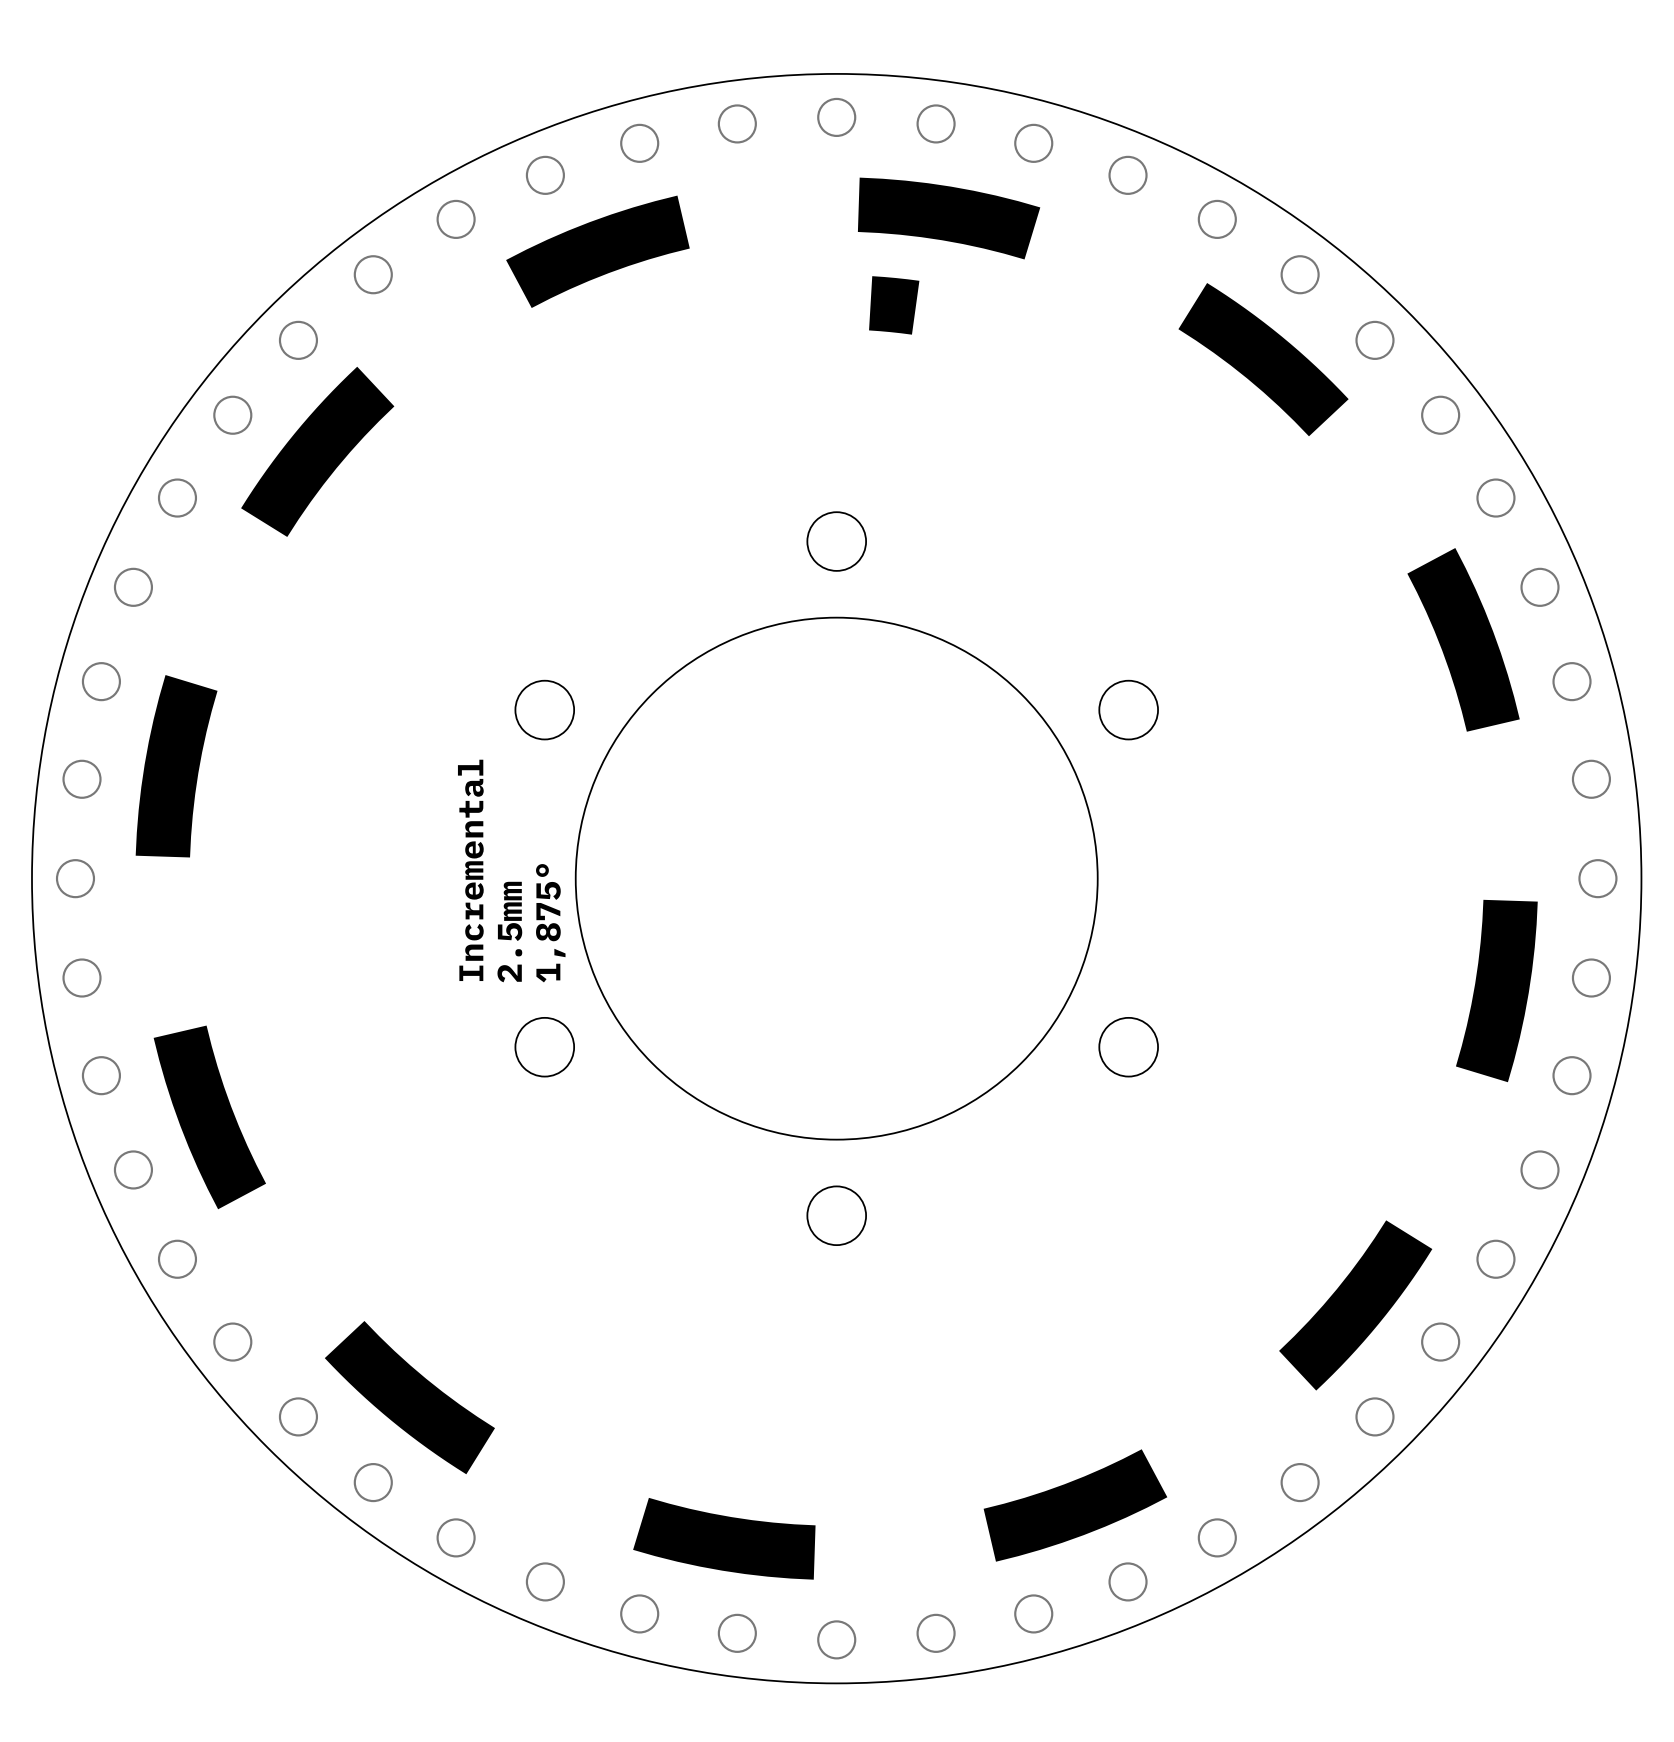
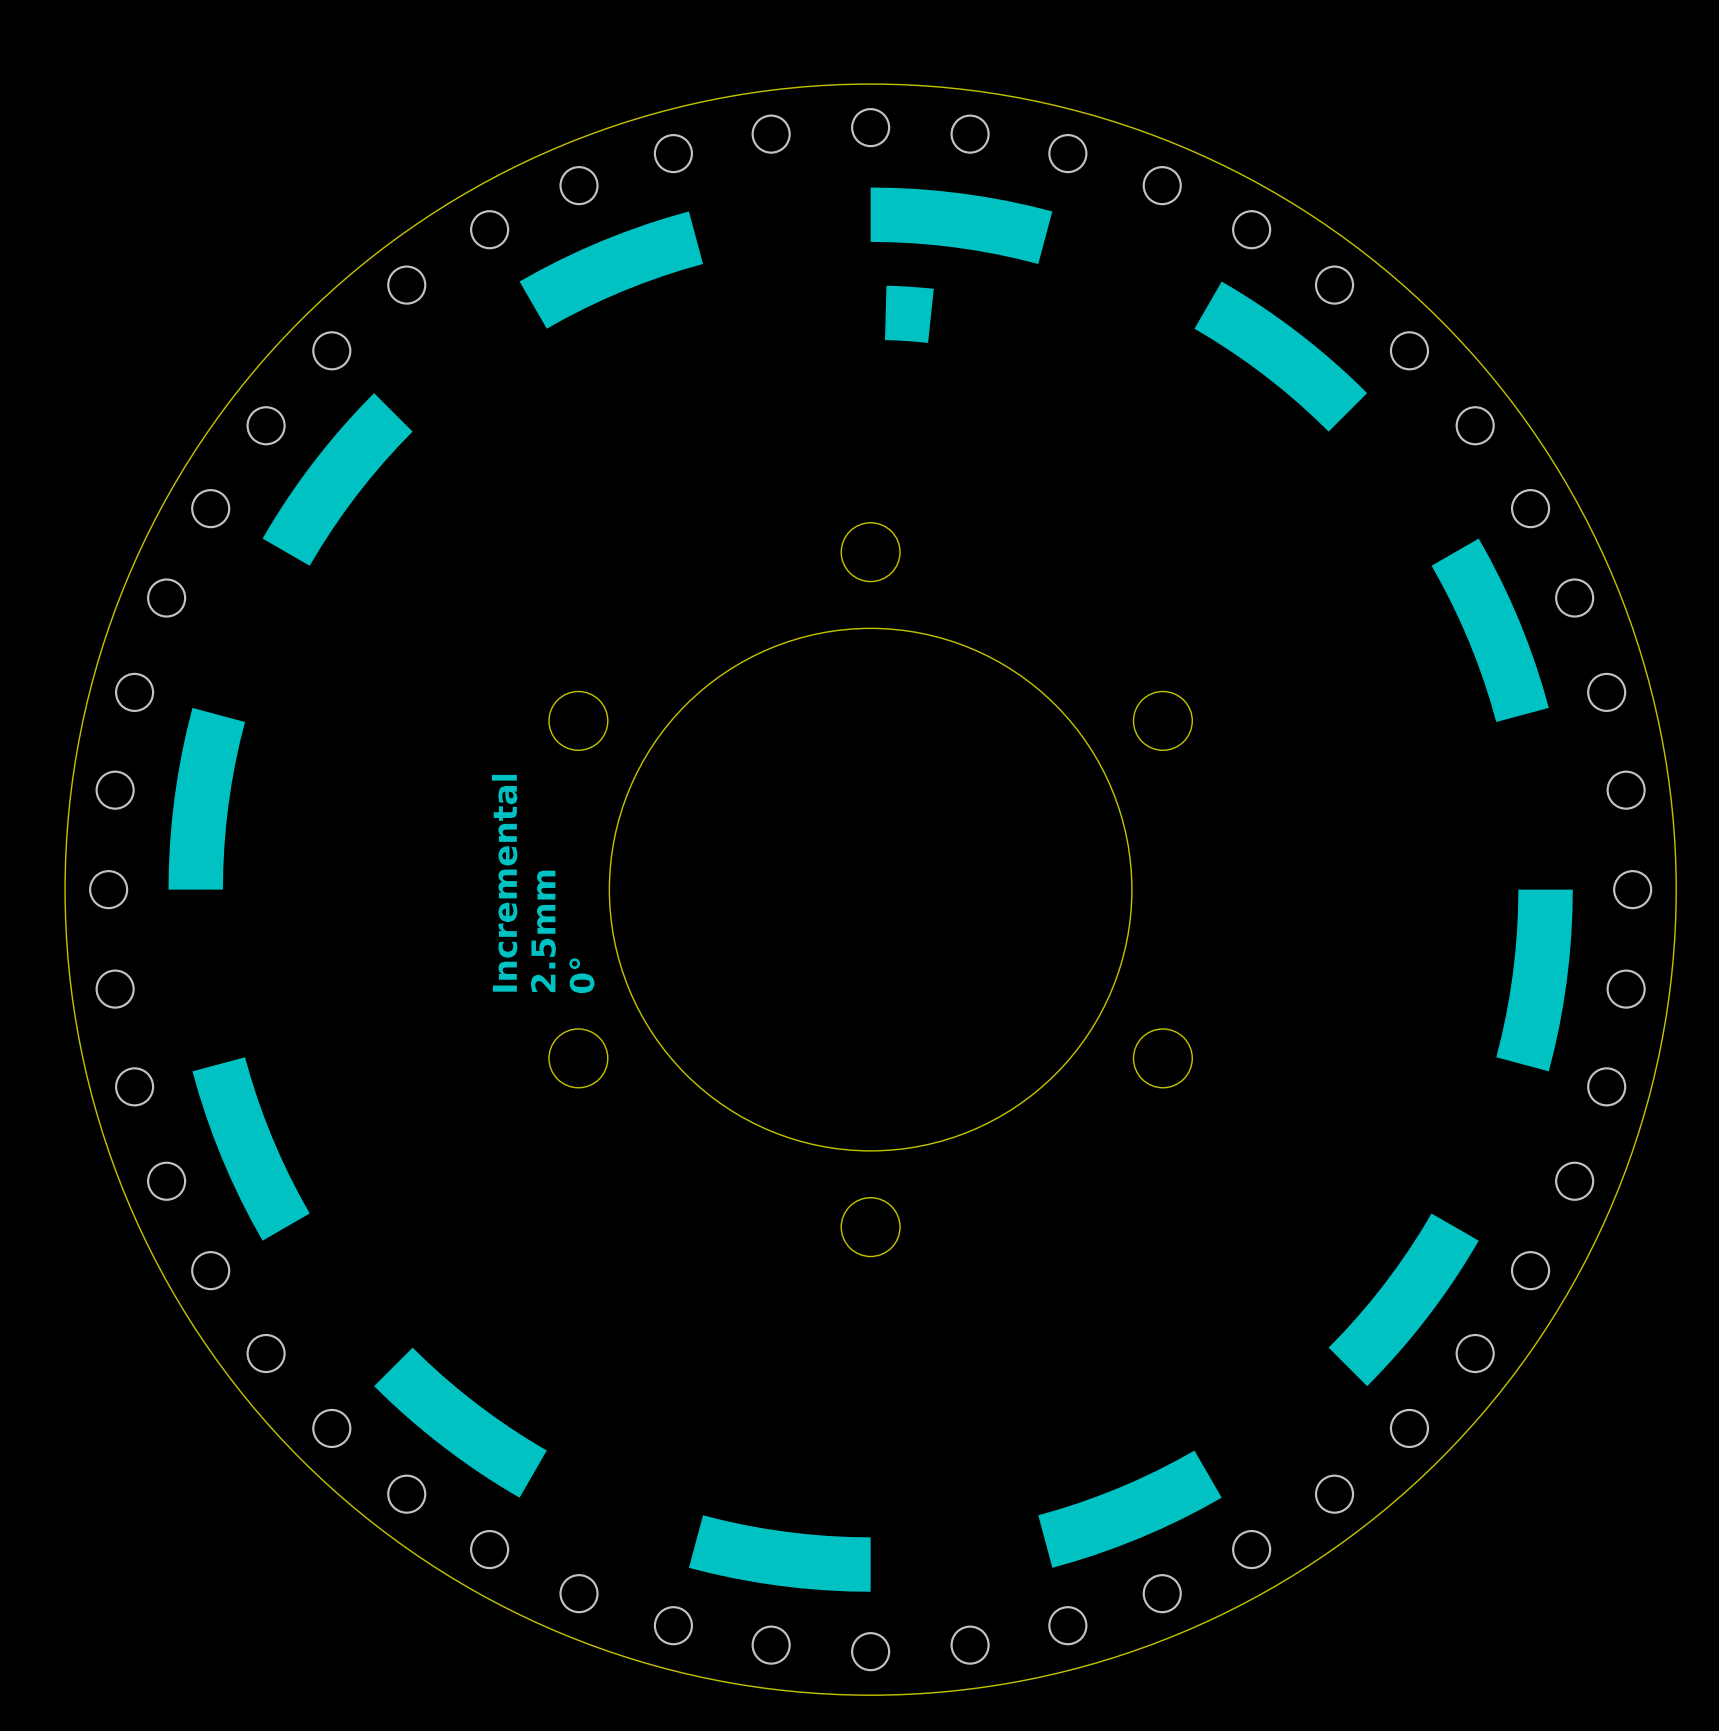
drawing shape: [135, 177, 1538, 1580] -> [168, 187, 1573, 1592]
text: 1,875° (550, 923) -> 0° (581, 975)

